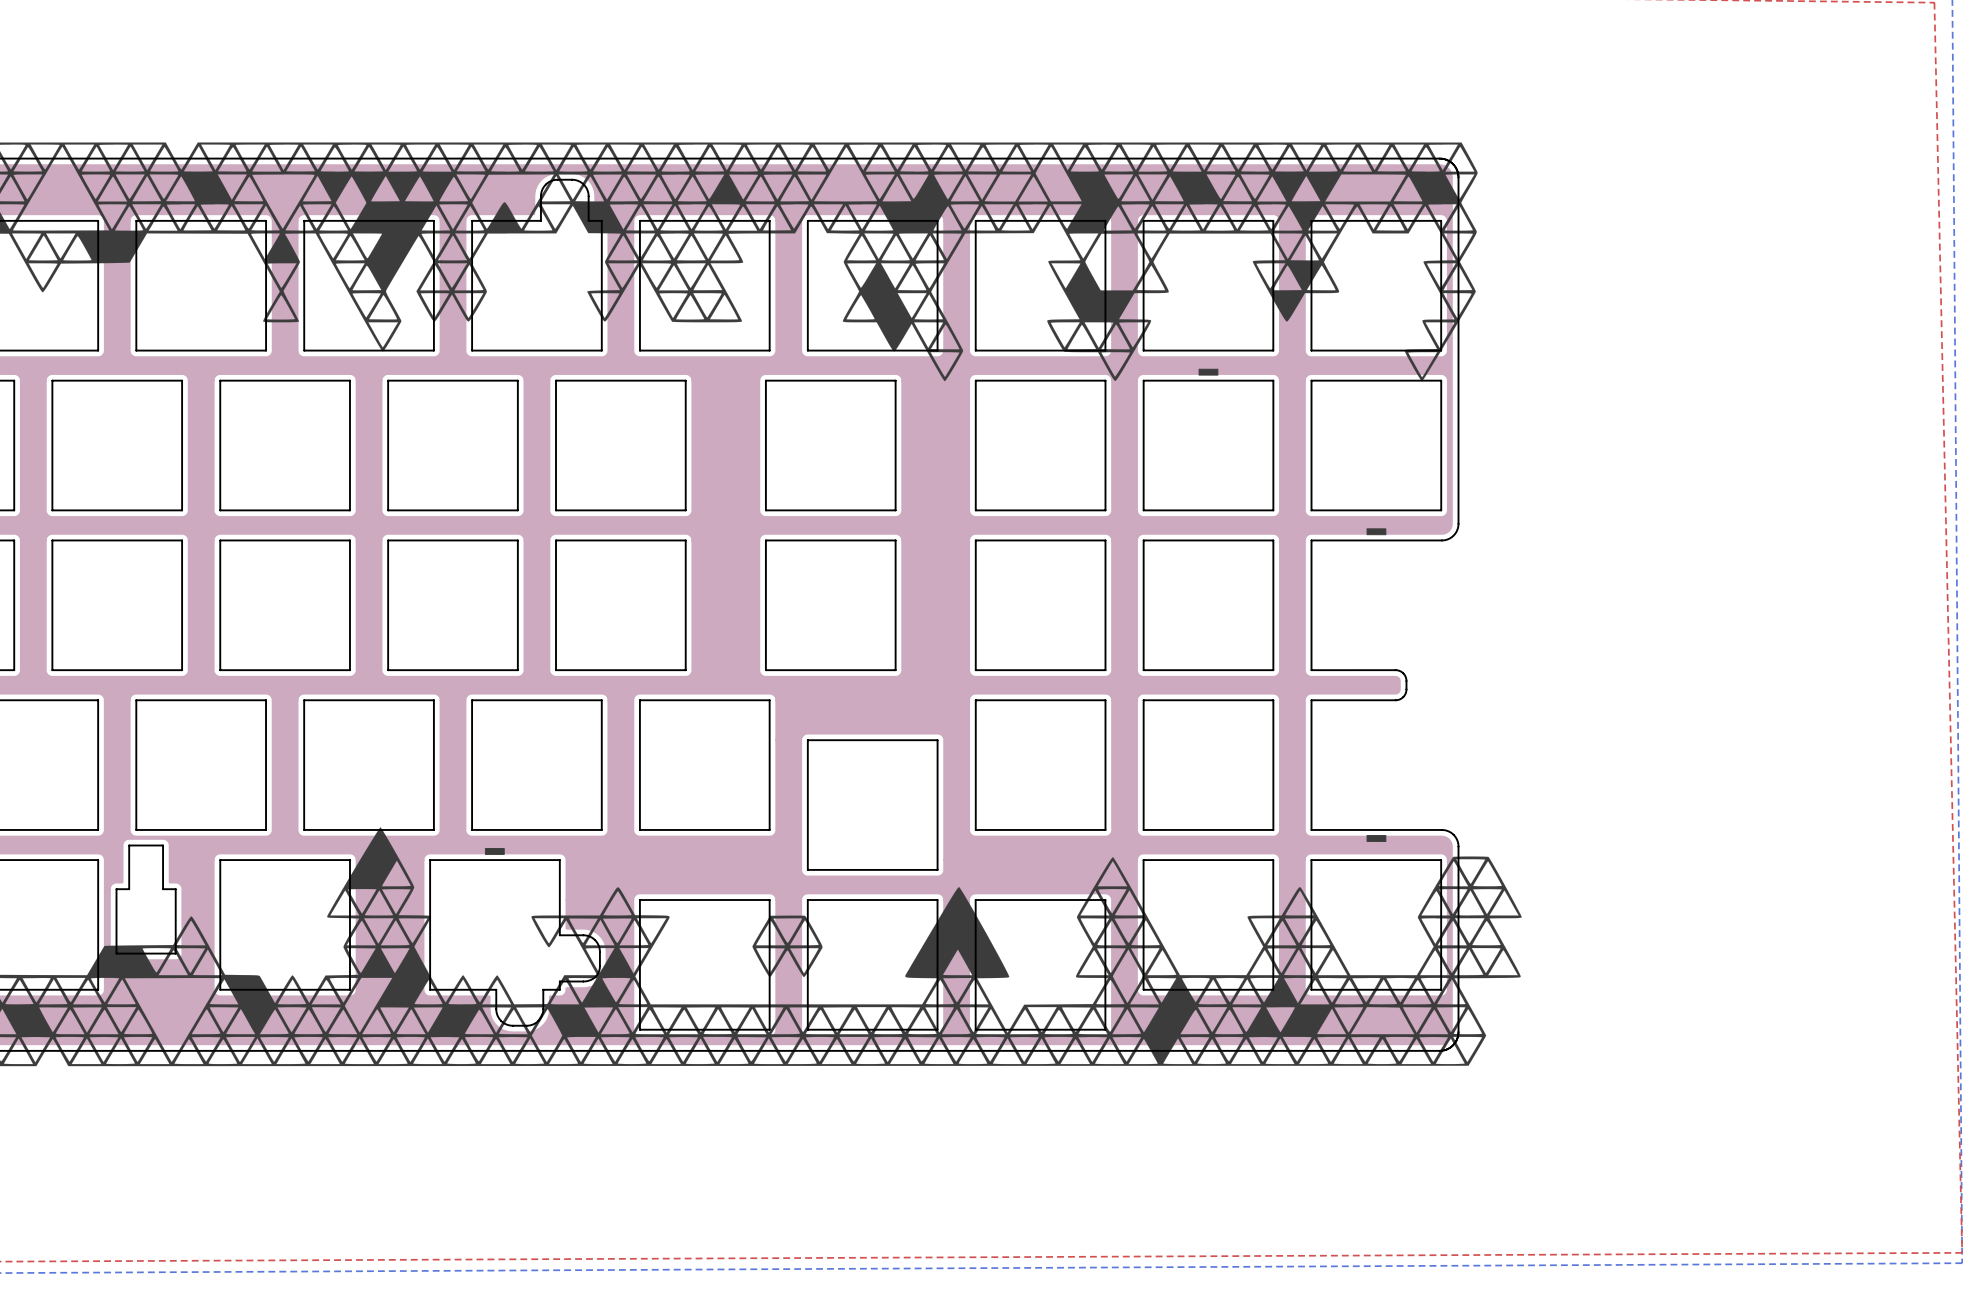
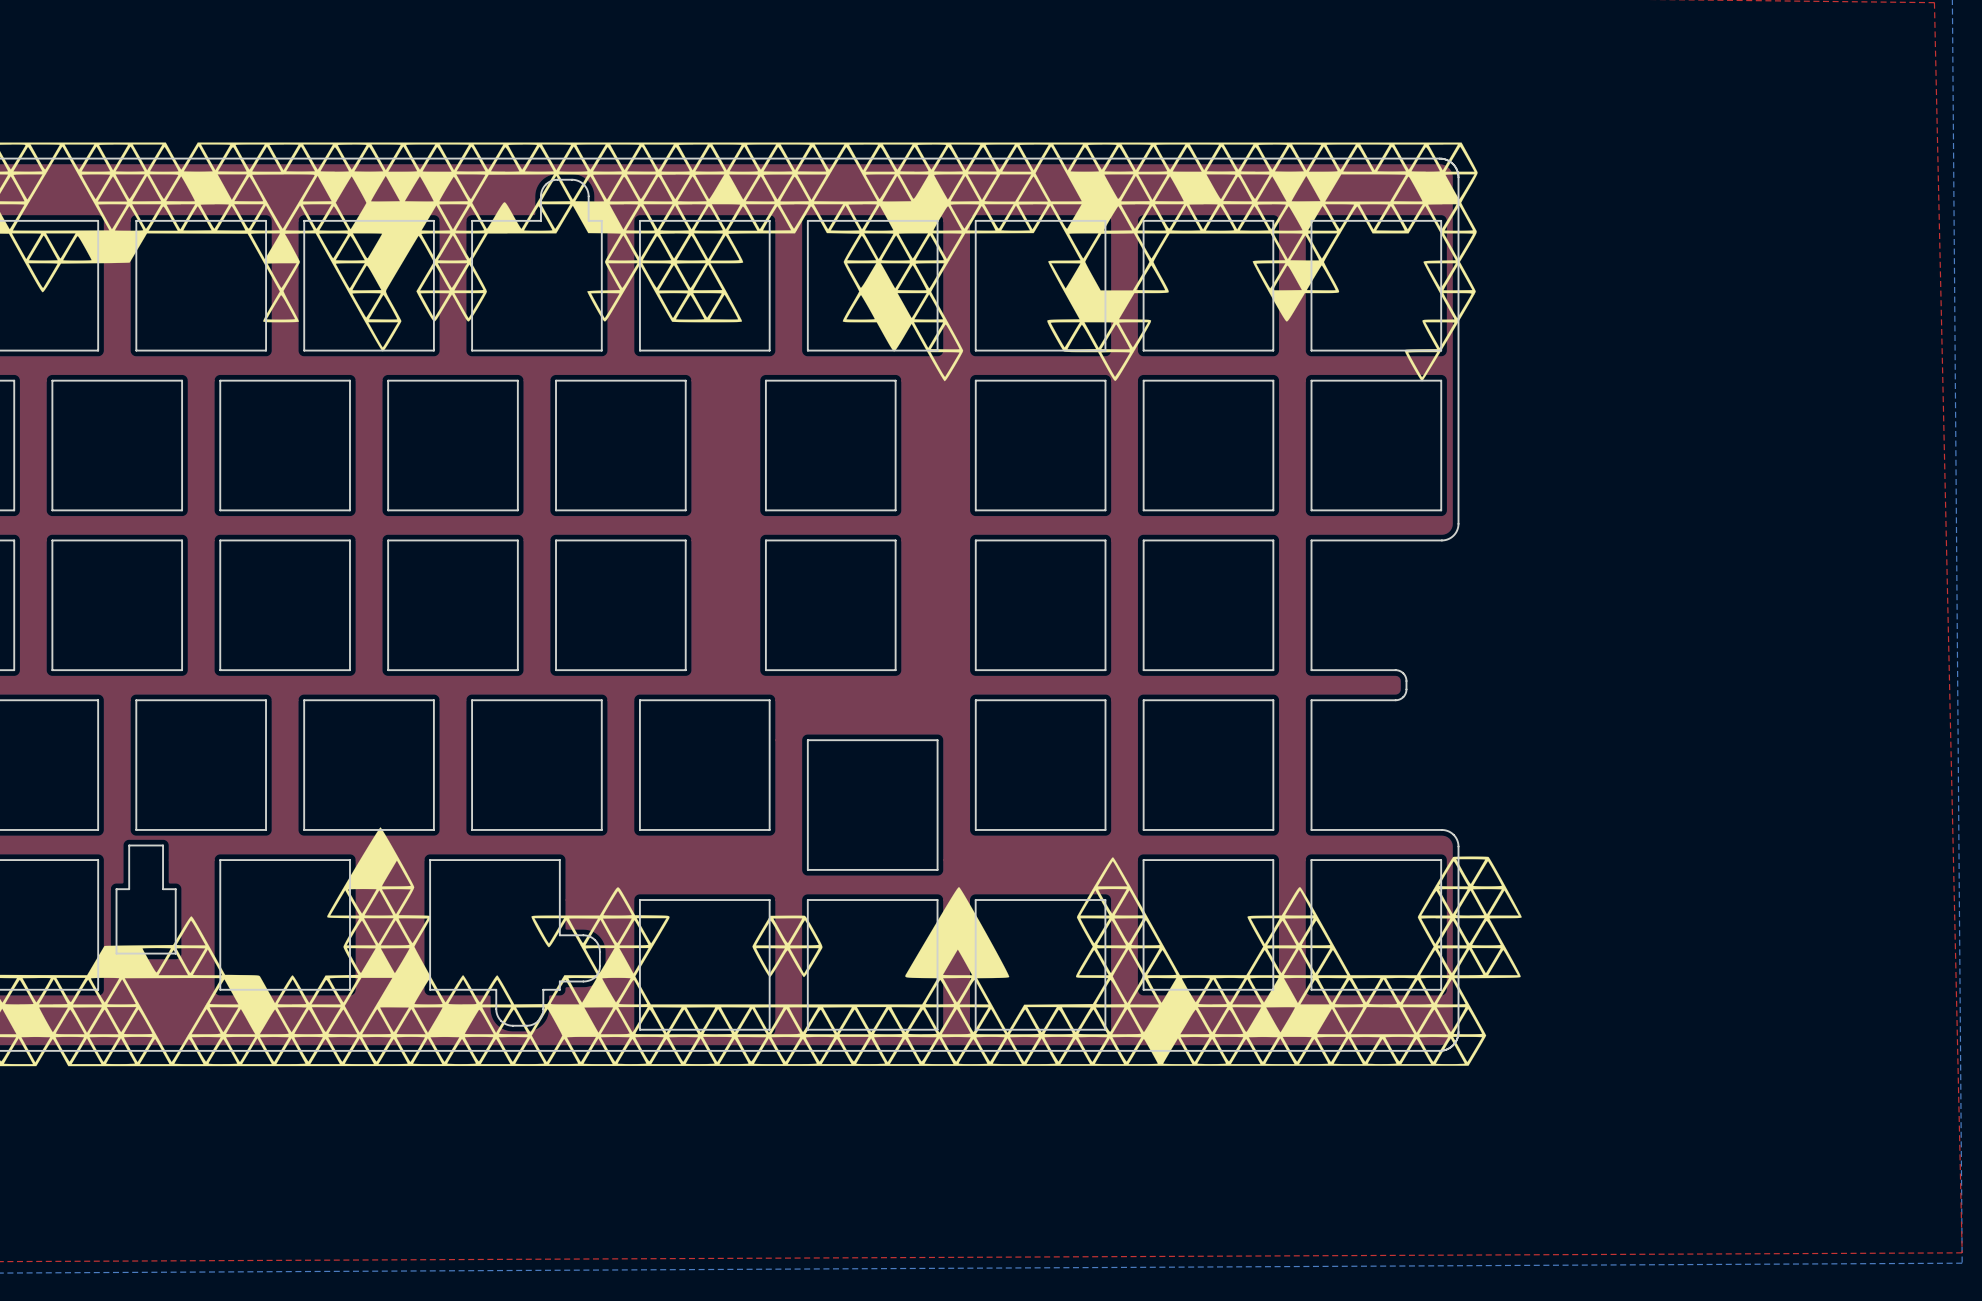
drawing: [1198, 368, 1219, 376] -> none
drawing: [1366, 528, 1387, 536] -> none
drawing: [1366, 835, 1387, 842] -> none
drawing: [484, 848, 505, 855] -> none

